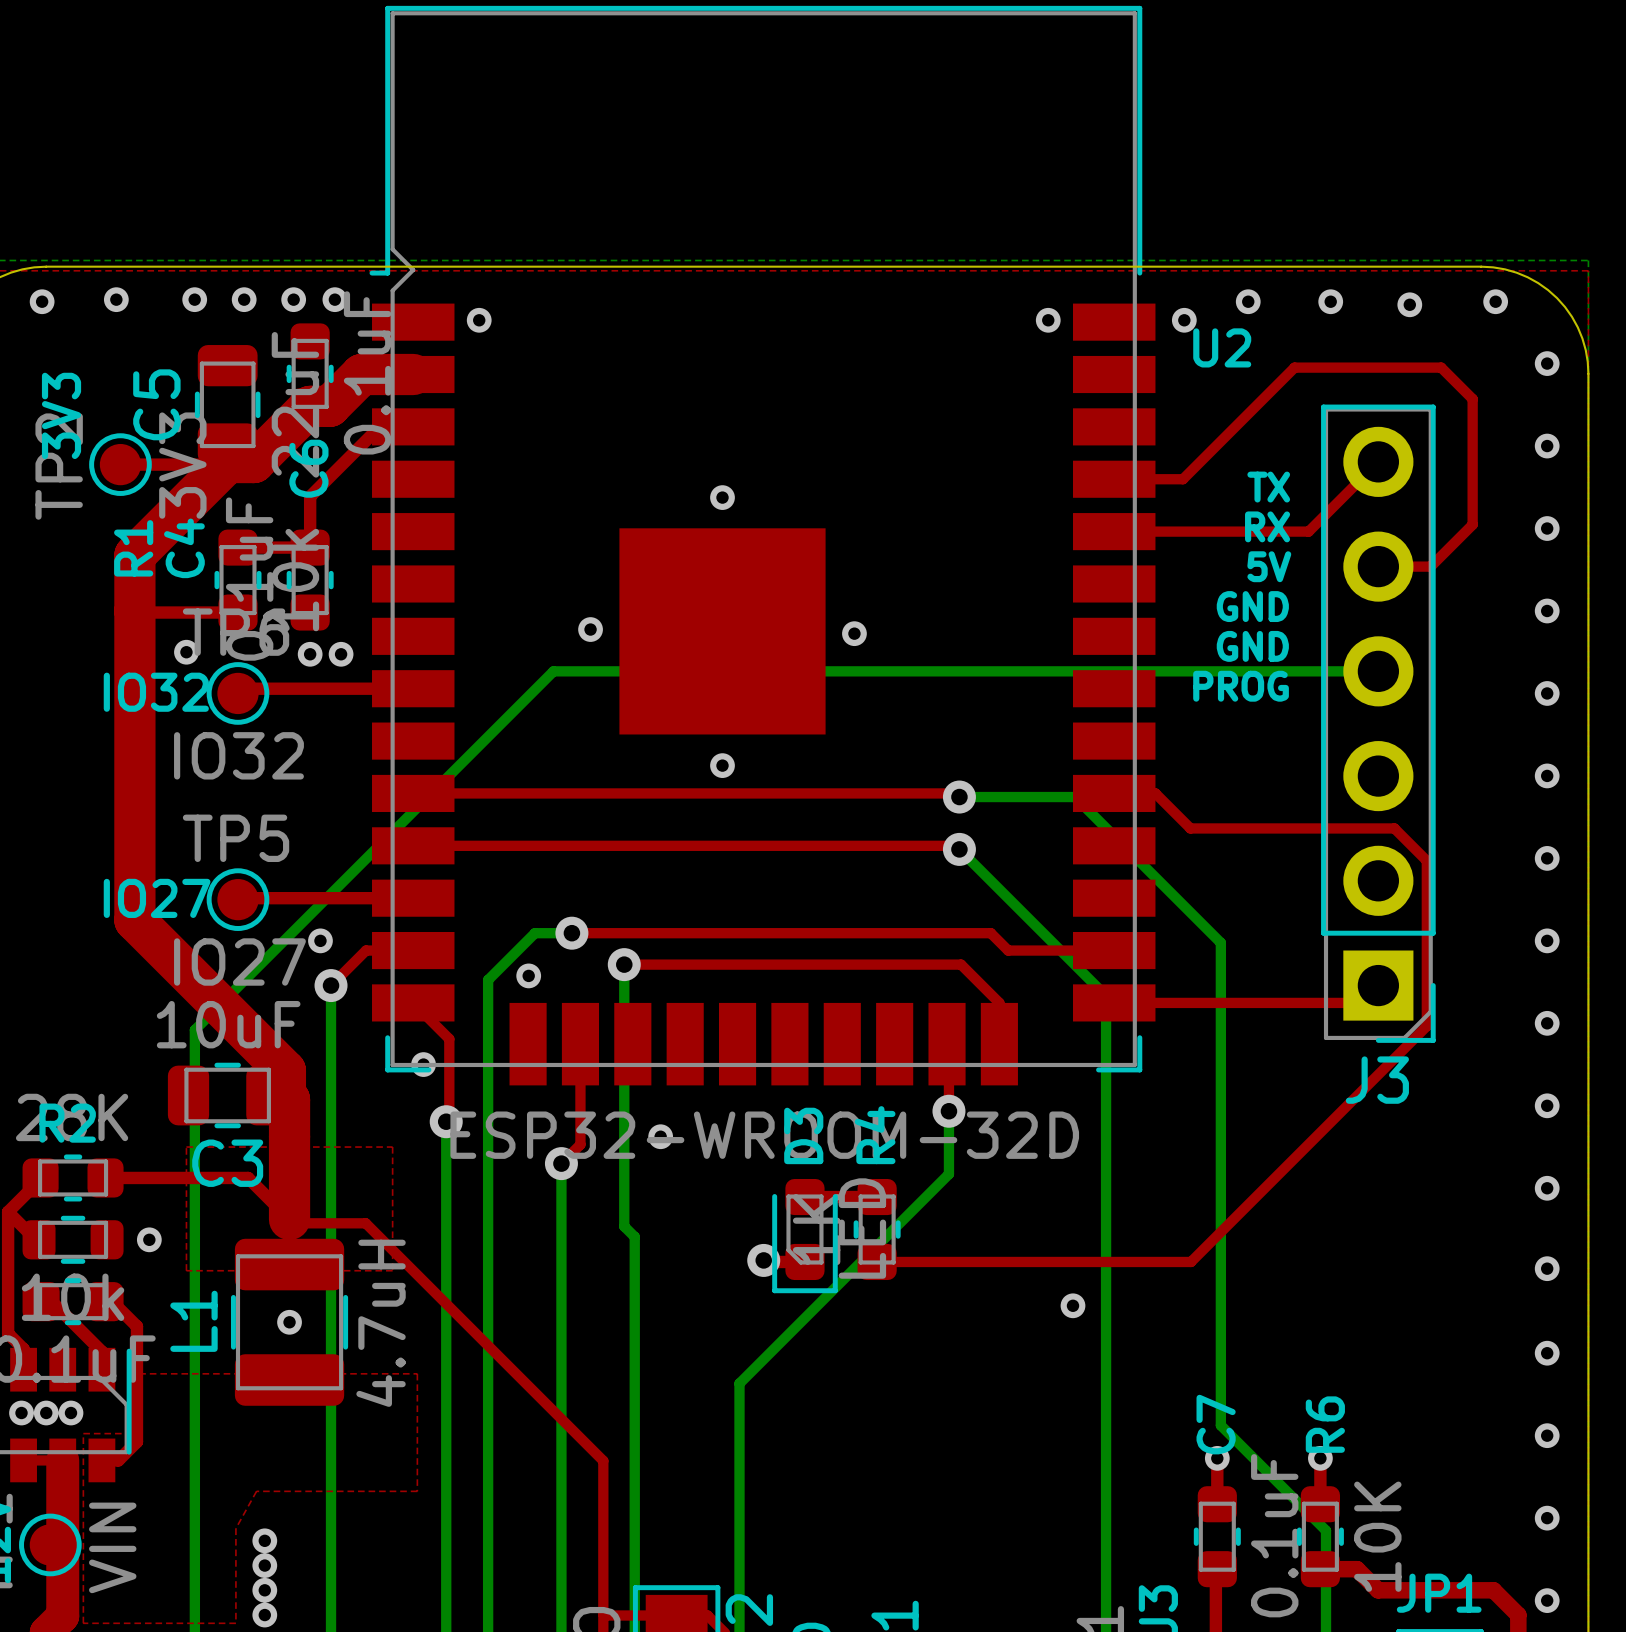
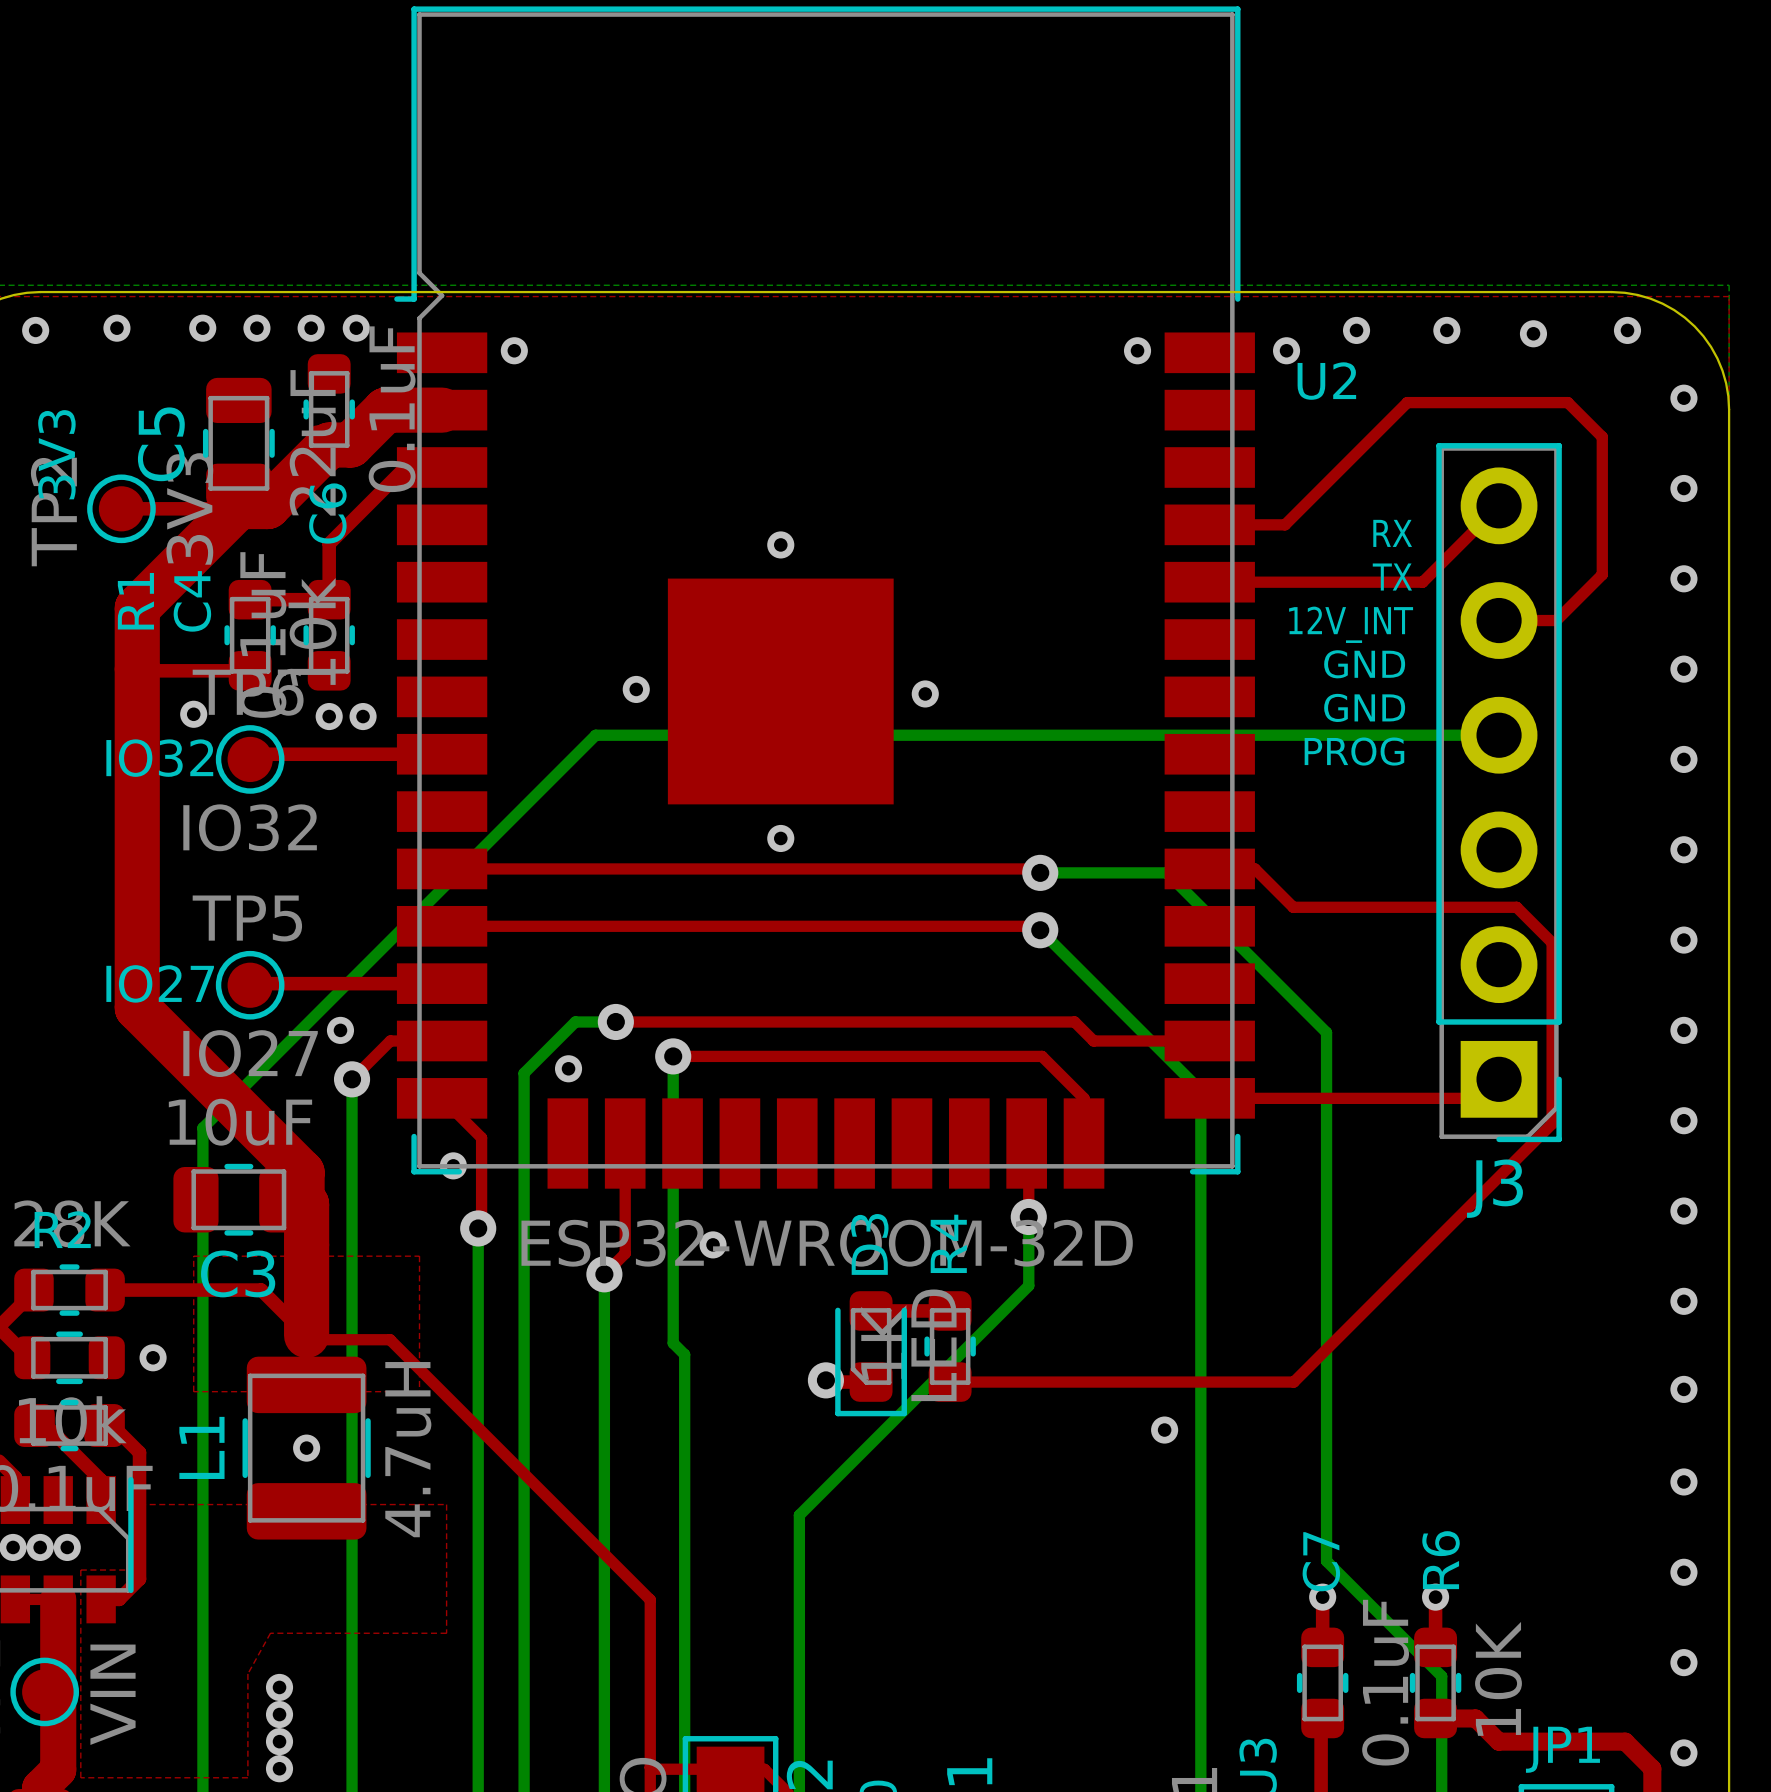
text position: TX (1268, 487) -> TX (1392, 577)
text position: RX (1267, 526) -> RX (1392, 533)
text: 5V (1269, 566) -> 12V_INT (1351, 624)

